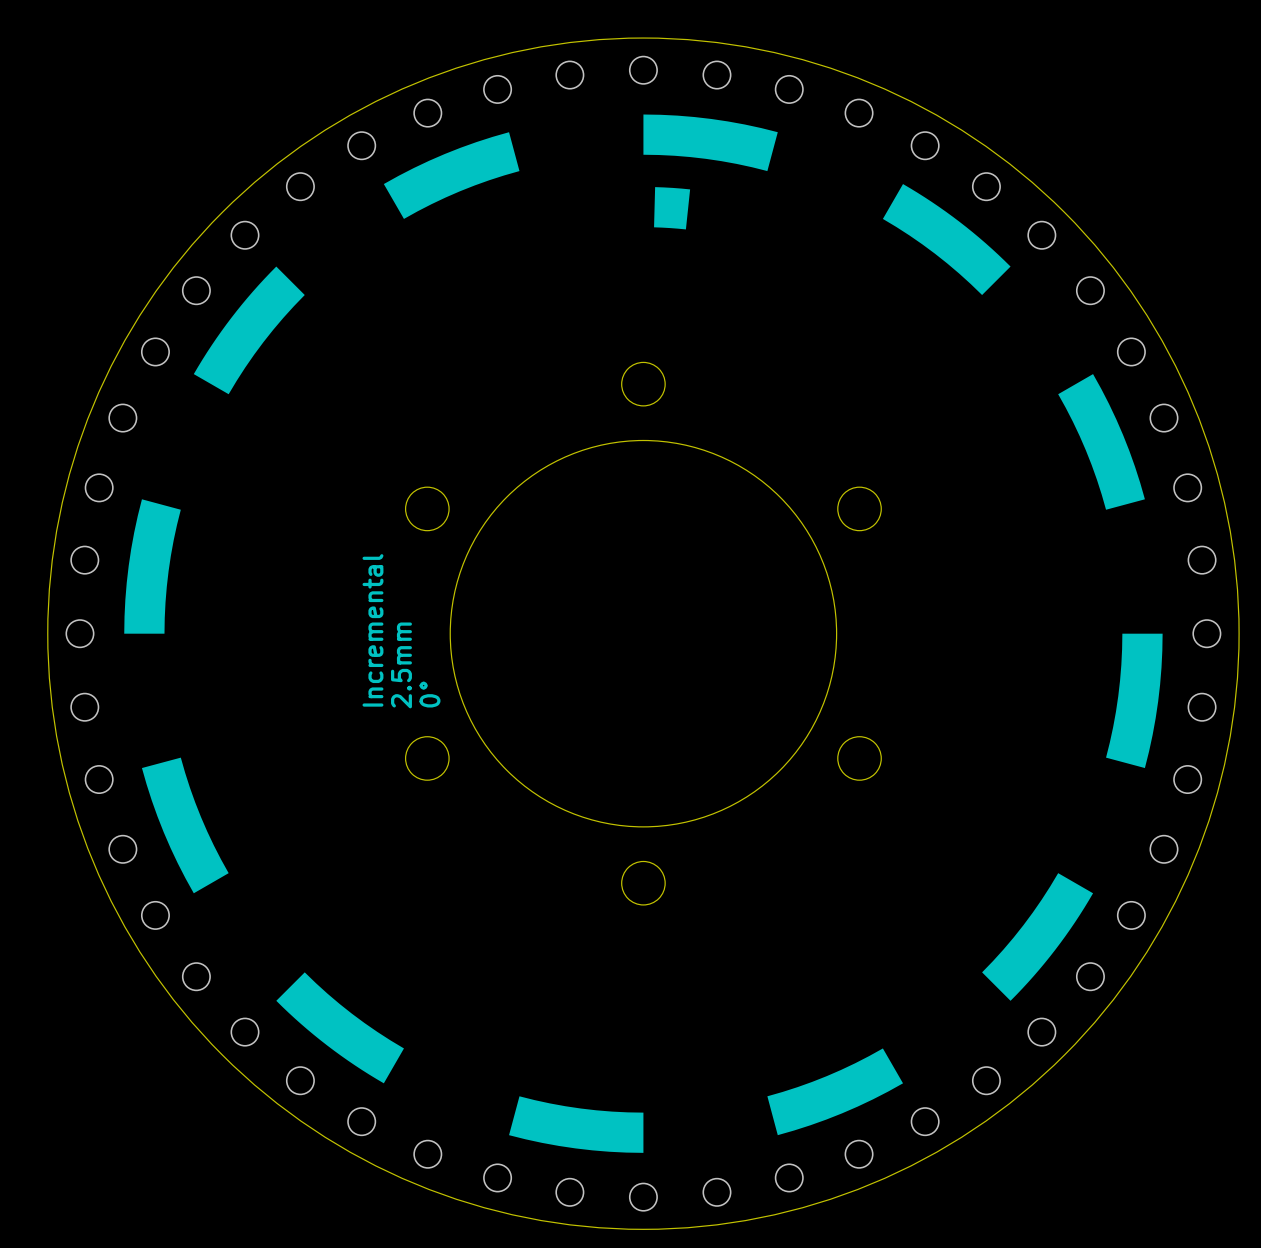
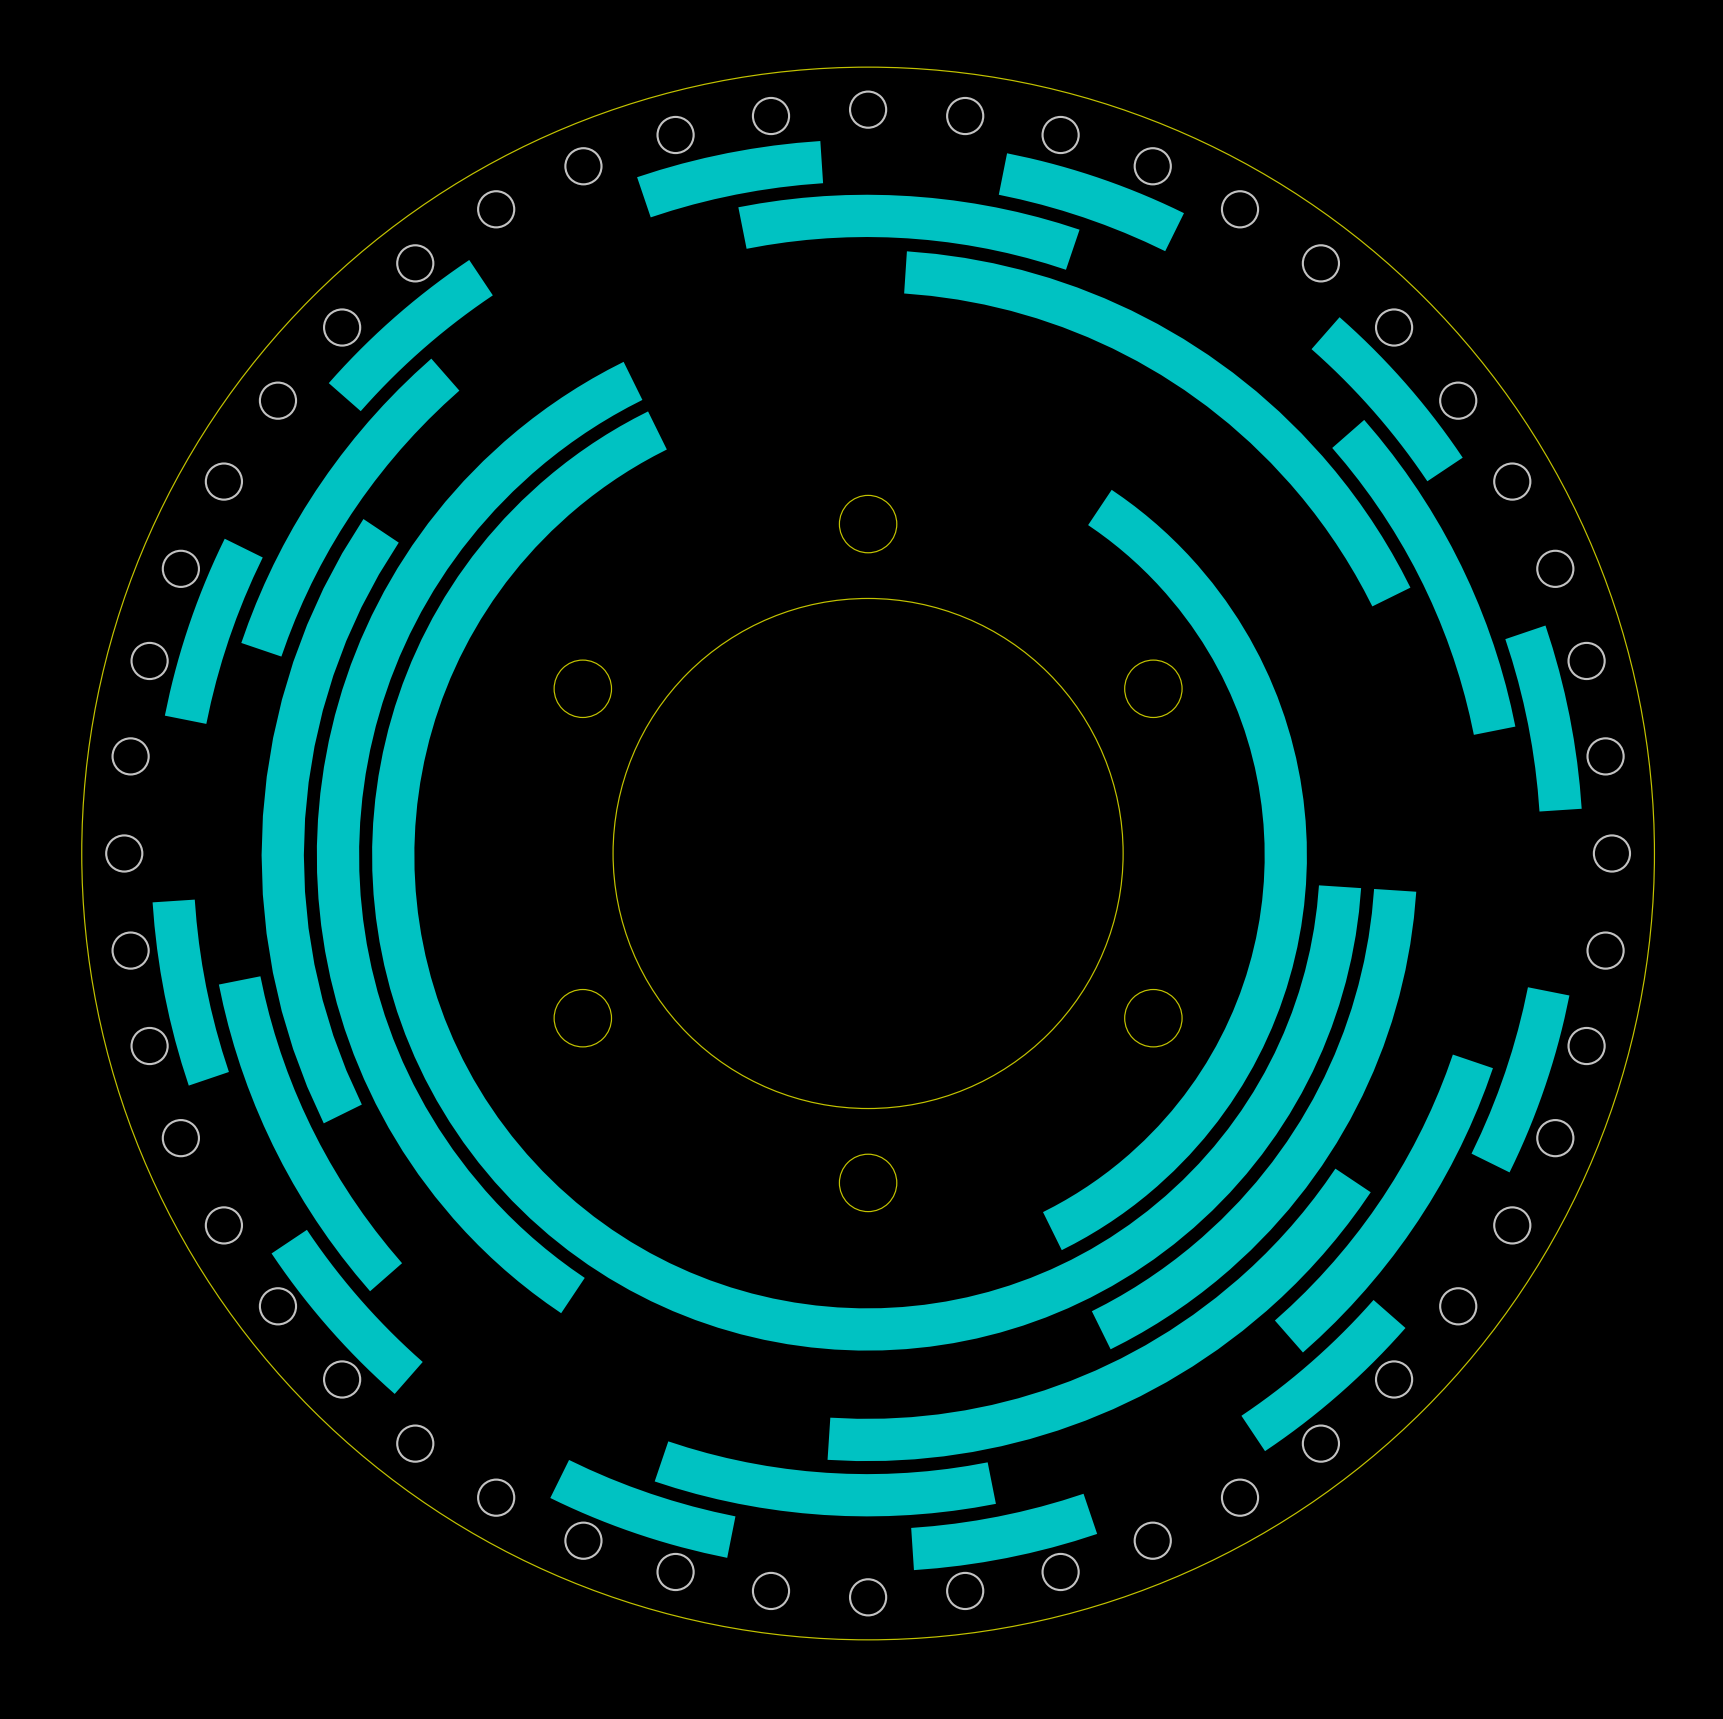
drawing shape: [124, 114, 1163, 1153] -> [152, 141, 1582, 1571]
text: Incremental (372, 630) -> none
text: 2.5mm (401, 665) -> none
text: 0° (429, 694) -> none

